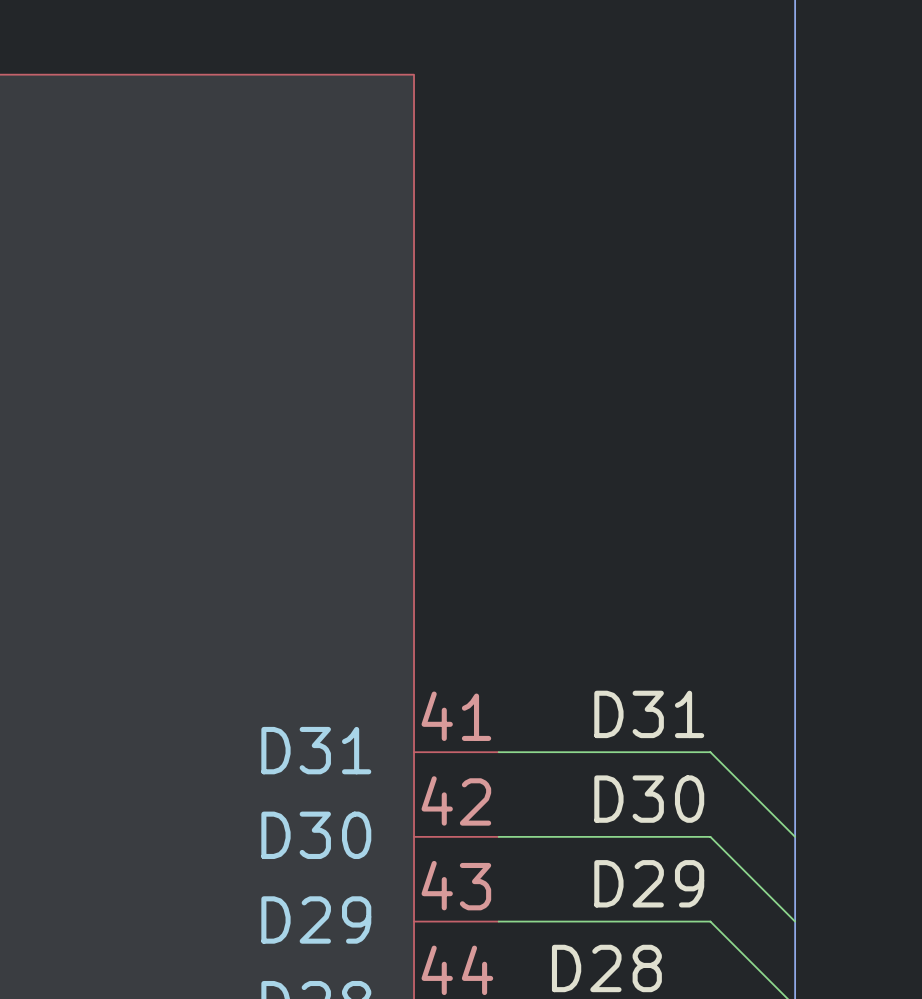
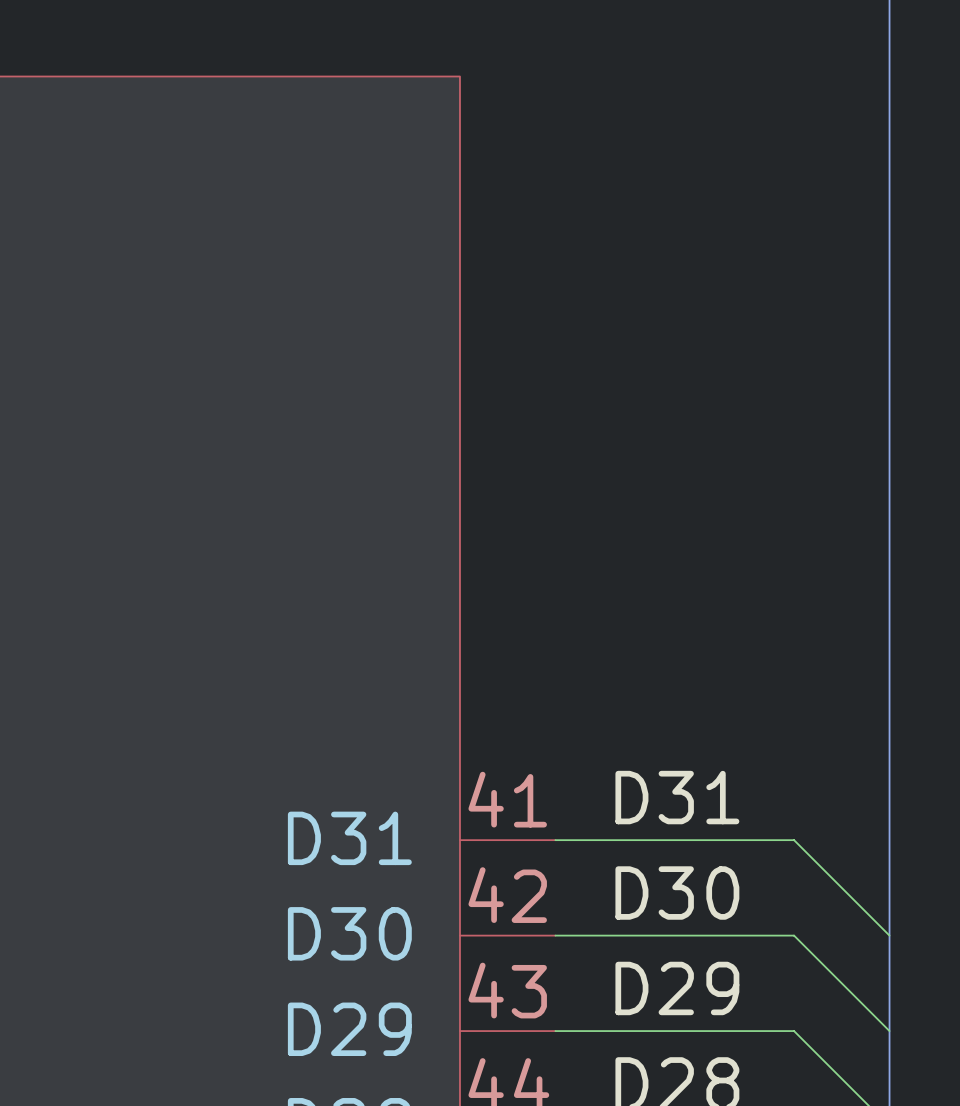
label position: D31 (649, 714) -> D31 (677, 797)
label position: D30 (649, 799) -> D30 (677, 893)
label position: D29 (649, 883) -> D29 (677, 988)

